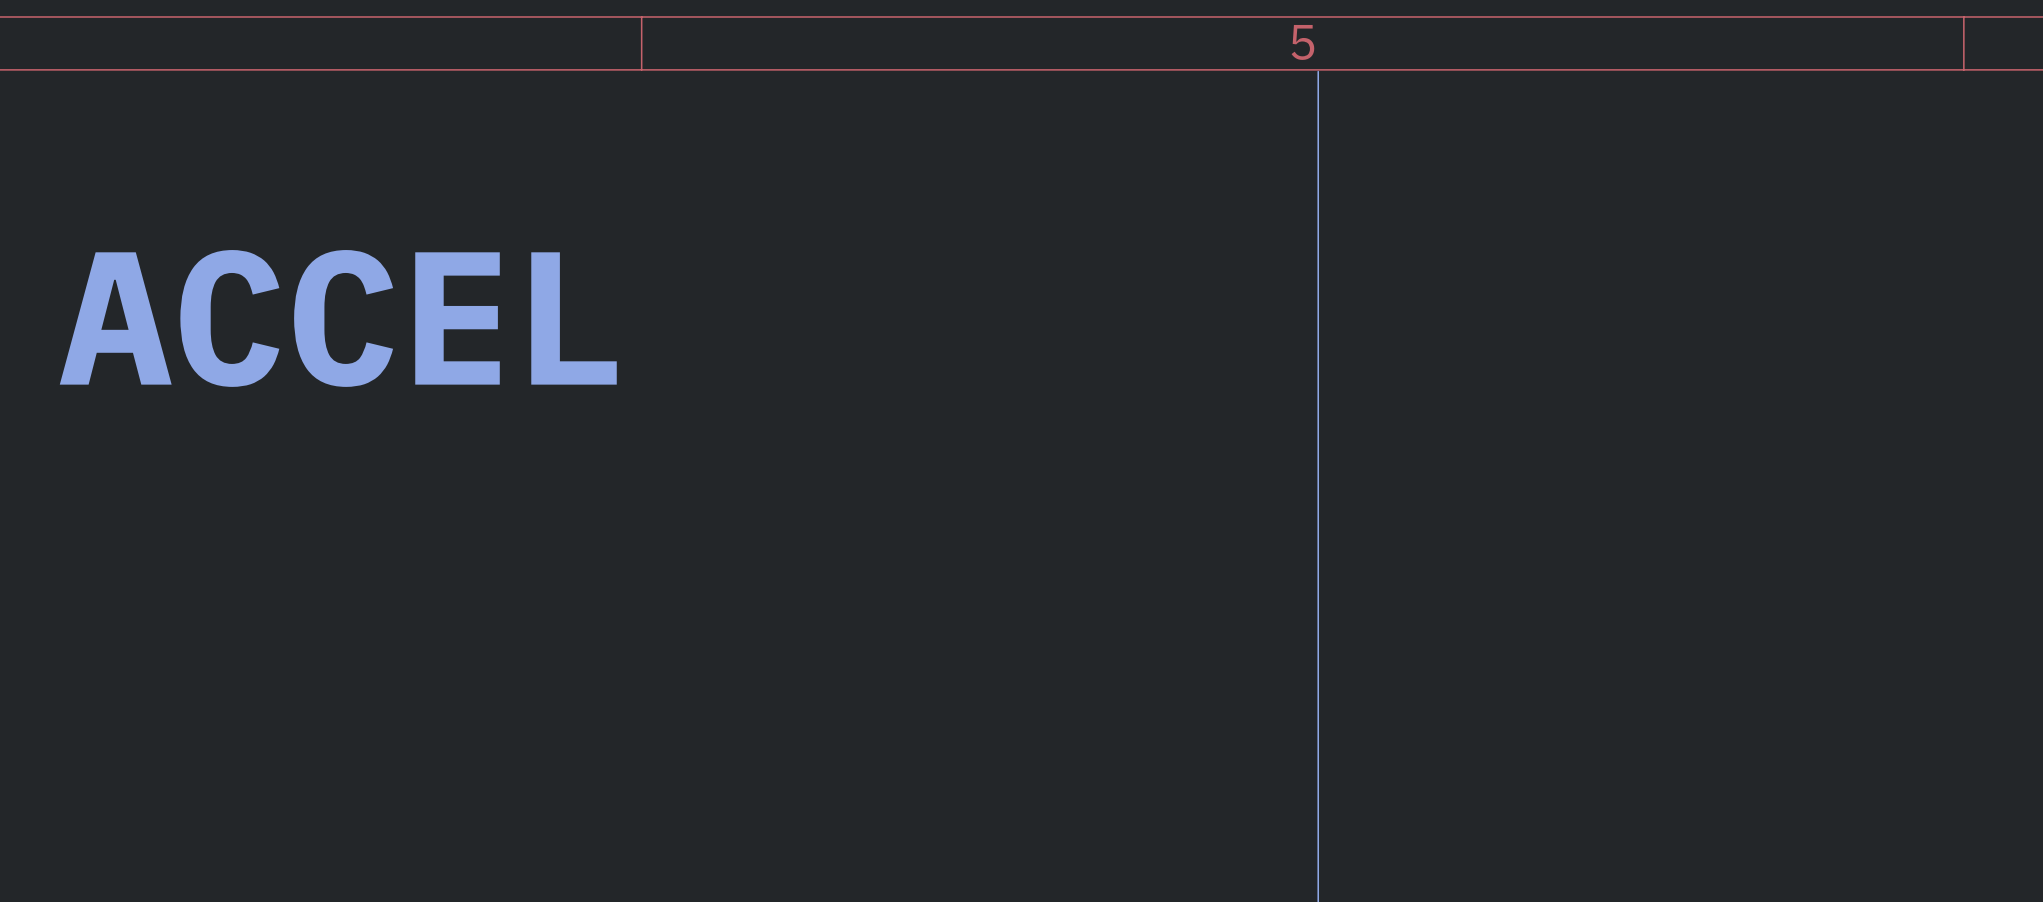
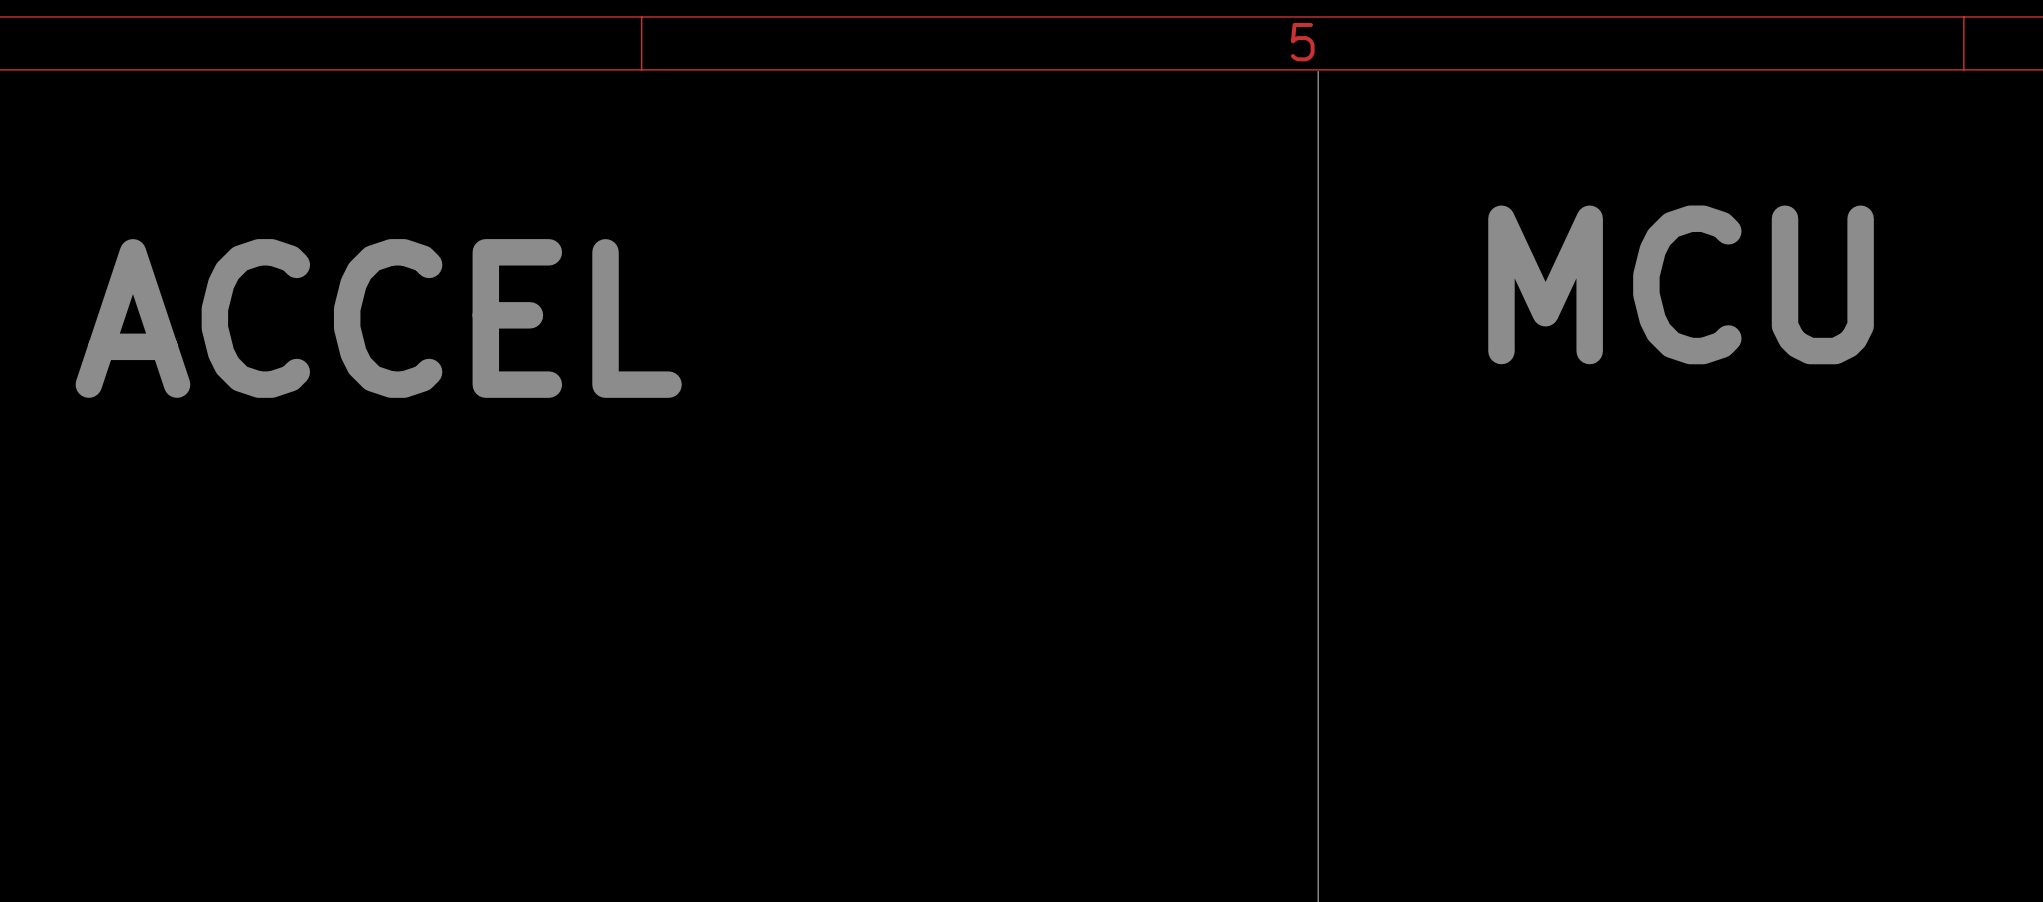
text: none -> MCU (1681, 284)

